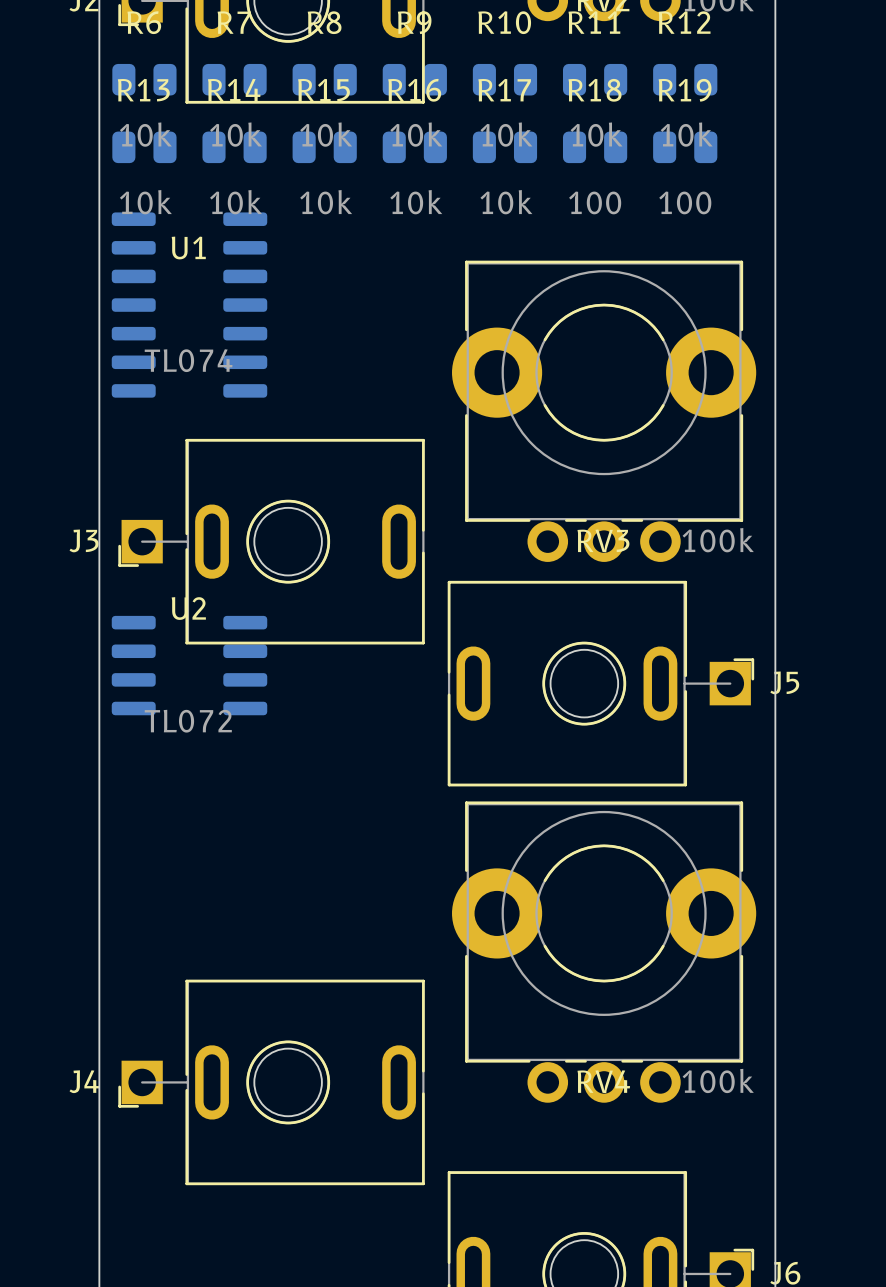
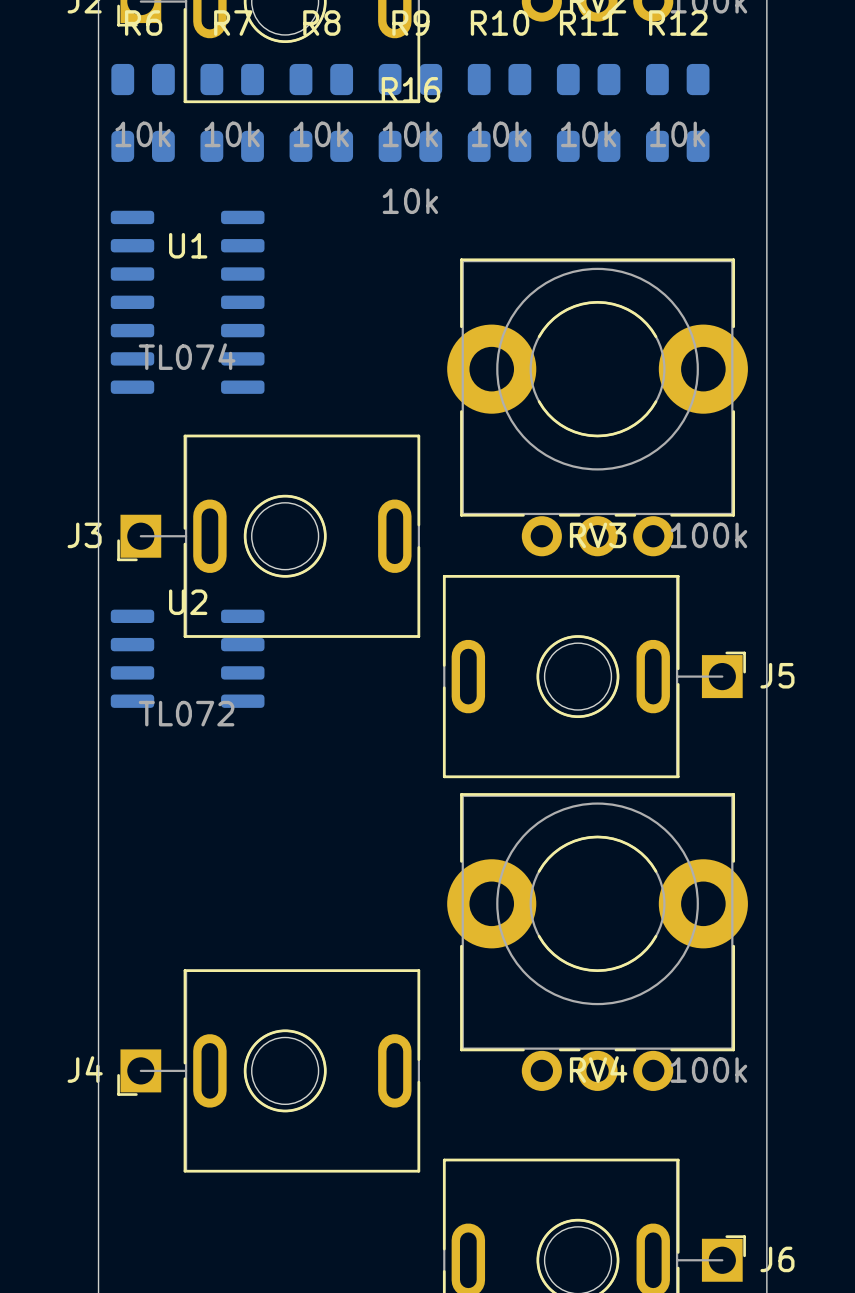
R13 name: R13 (143, 90) -> none
R14 name: R14 (234, 90) -> none
R15 name: R15 (323, 90) -> none
R17 name: R17 (504, 90) -> none
R18 name: R18 (594, 90) -> none
R19 name: R19 (685, 90) -> none
R13 value: 10k (145, 202) -> none
R14 value: 10k (236, 202) -> none
R15 value: 10k (326, 202) -> none
R17 value: 10k (506, 202) -> none
R18 value: 100 (595, 202) -> none
R19 value: 100 (685, 202) -> none

